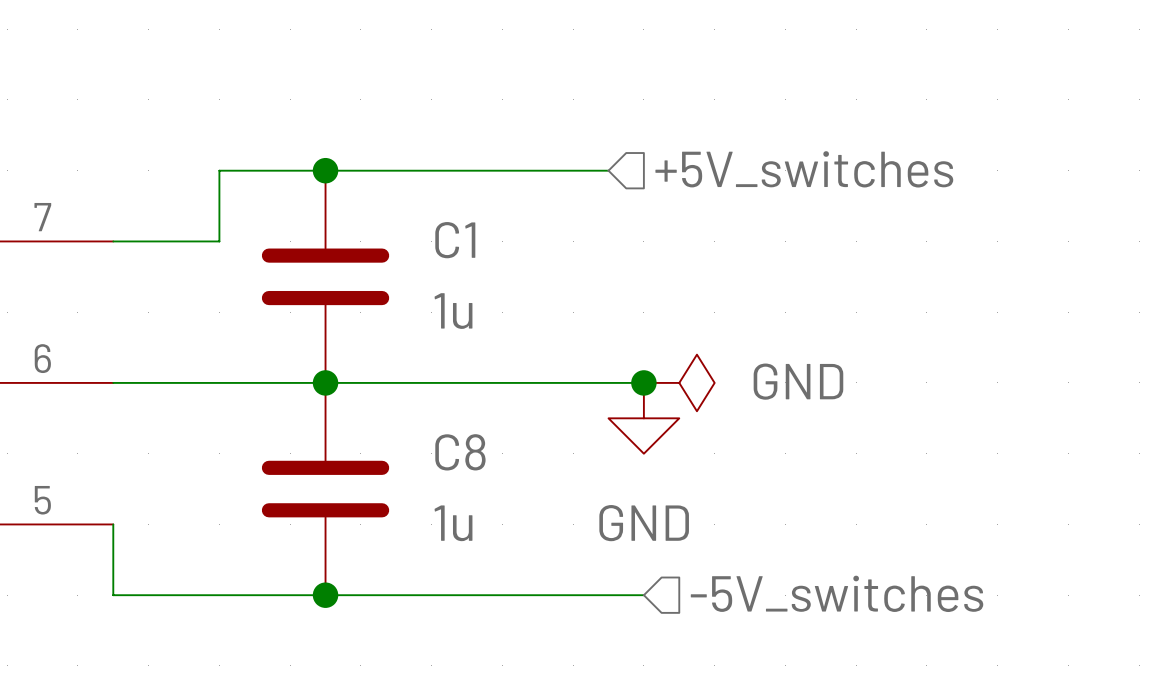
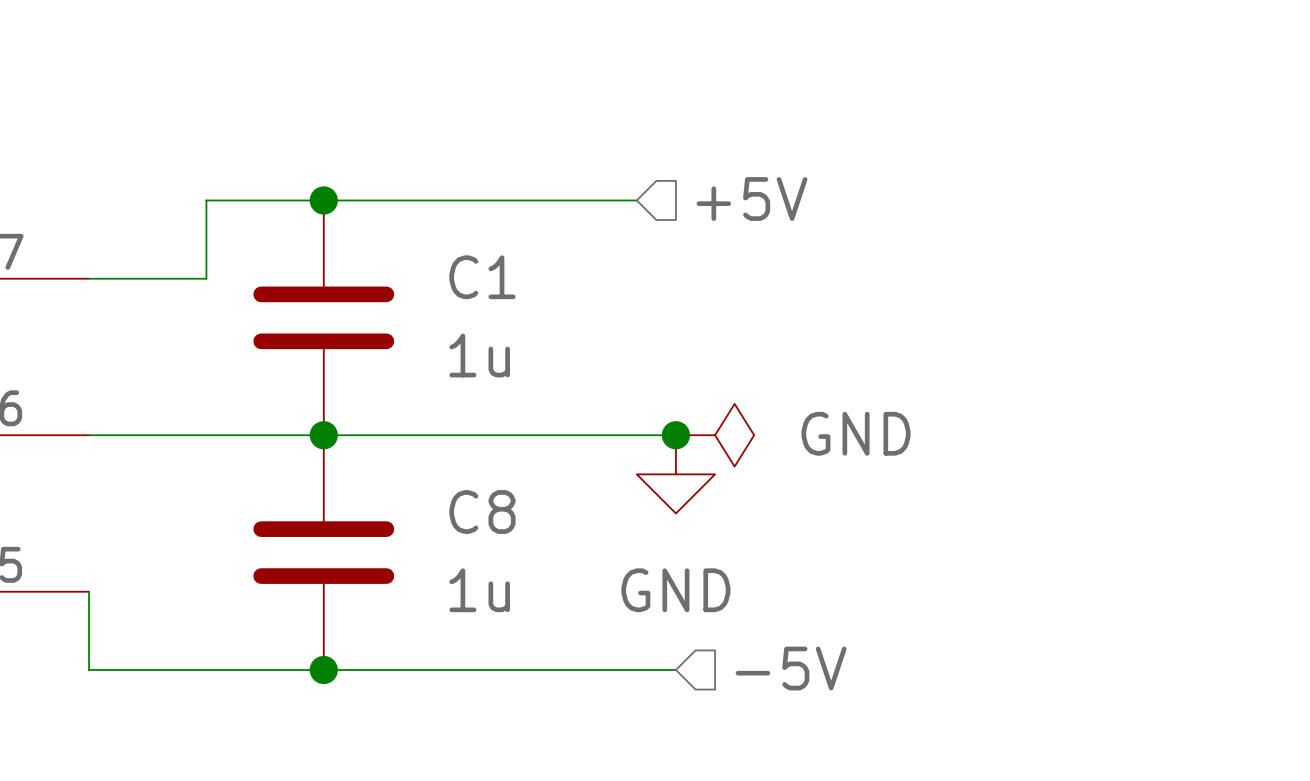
hierarchical label: +5V_switches (804, 169) -> +5V (752, 199)
hierarchical label: -5V_switches (837, 593) -> -5V (791, 668)

